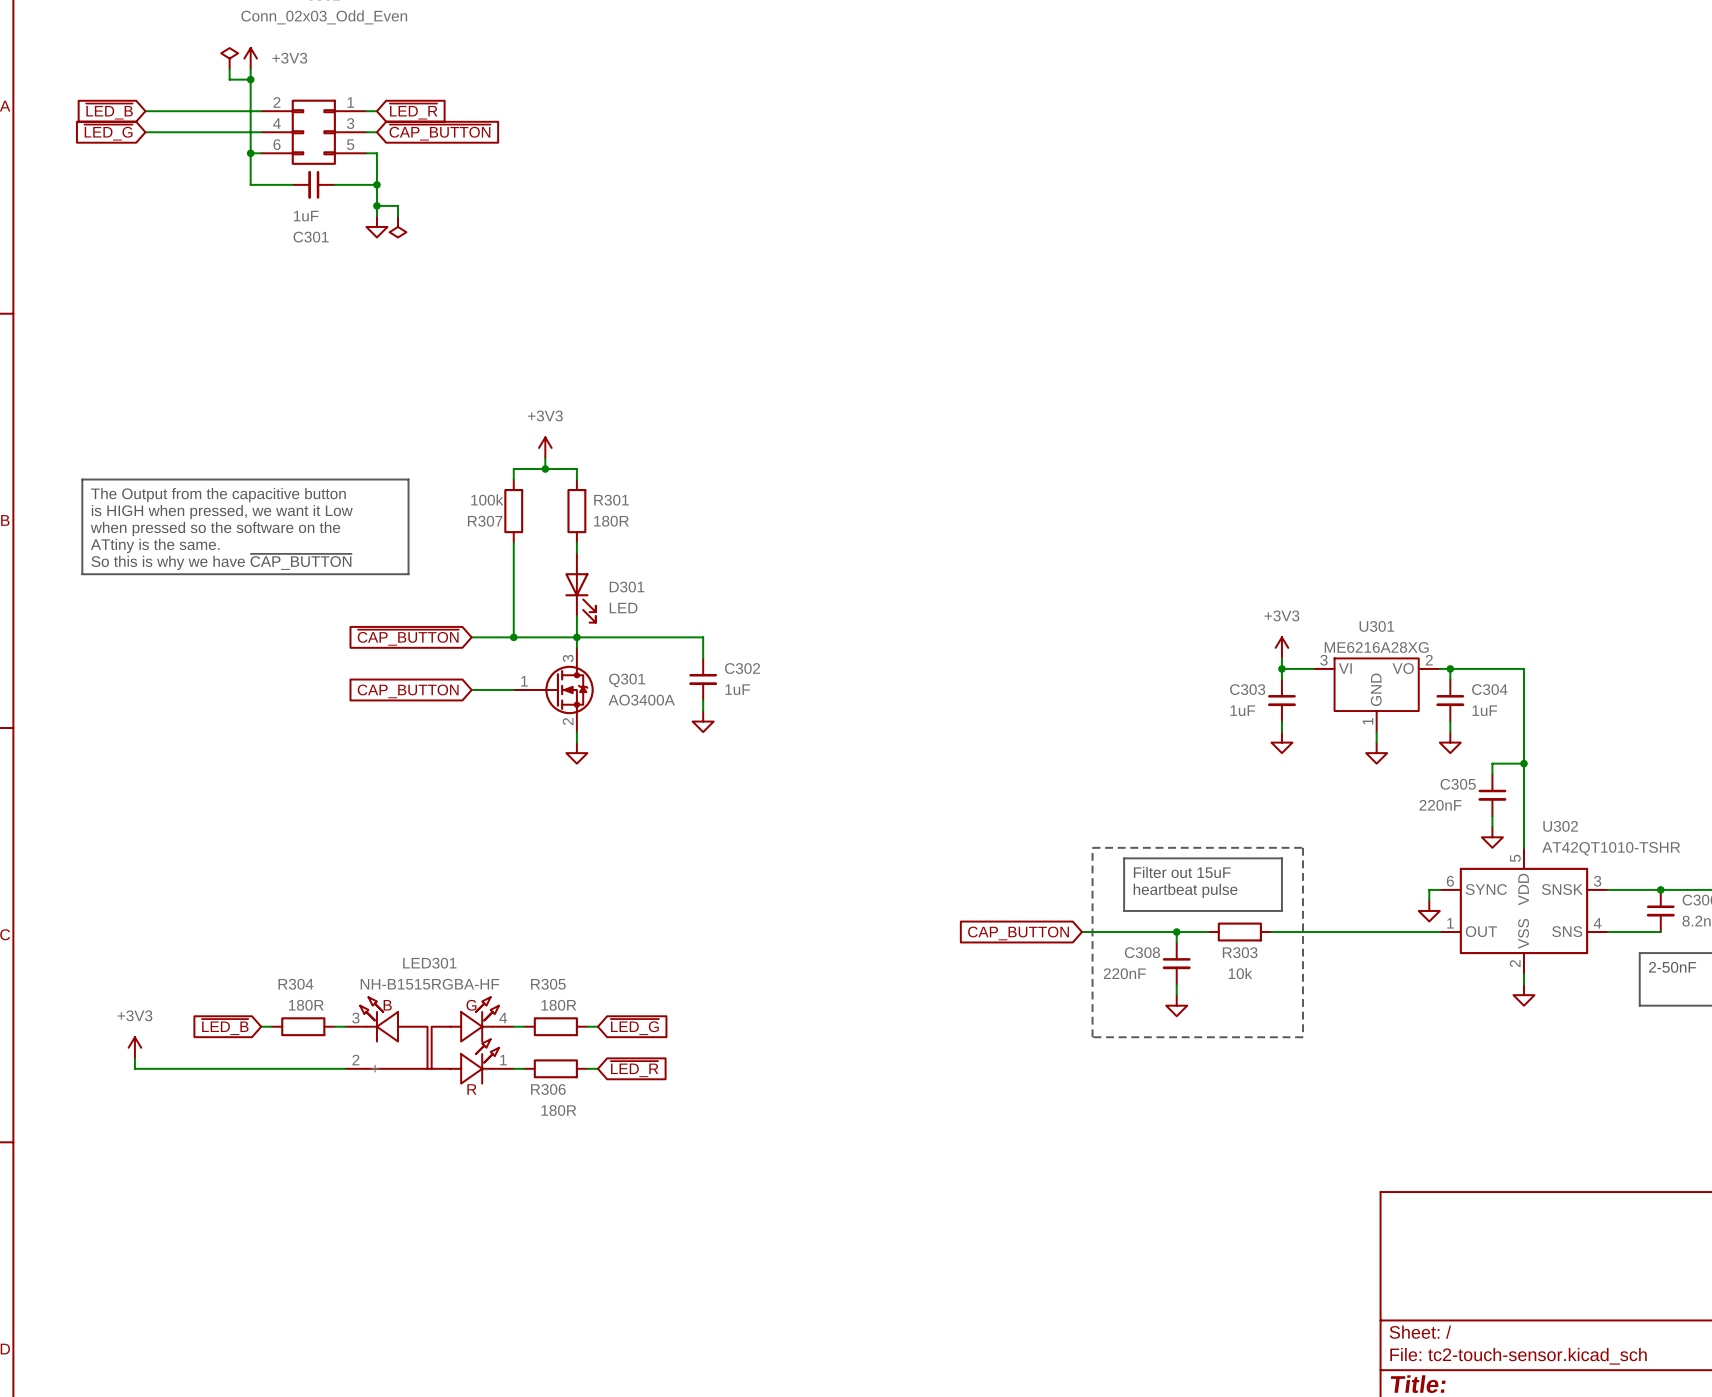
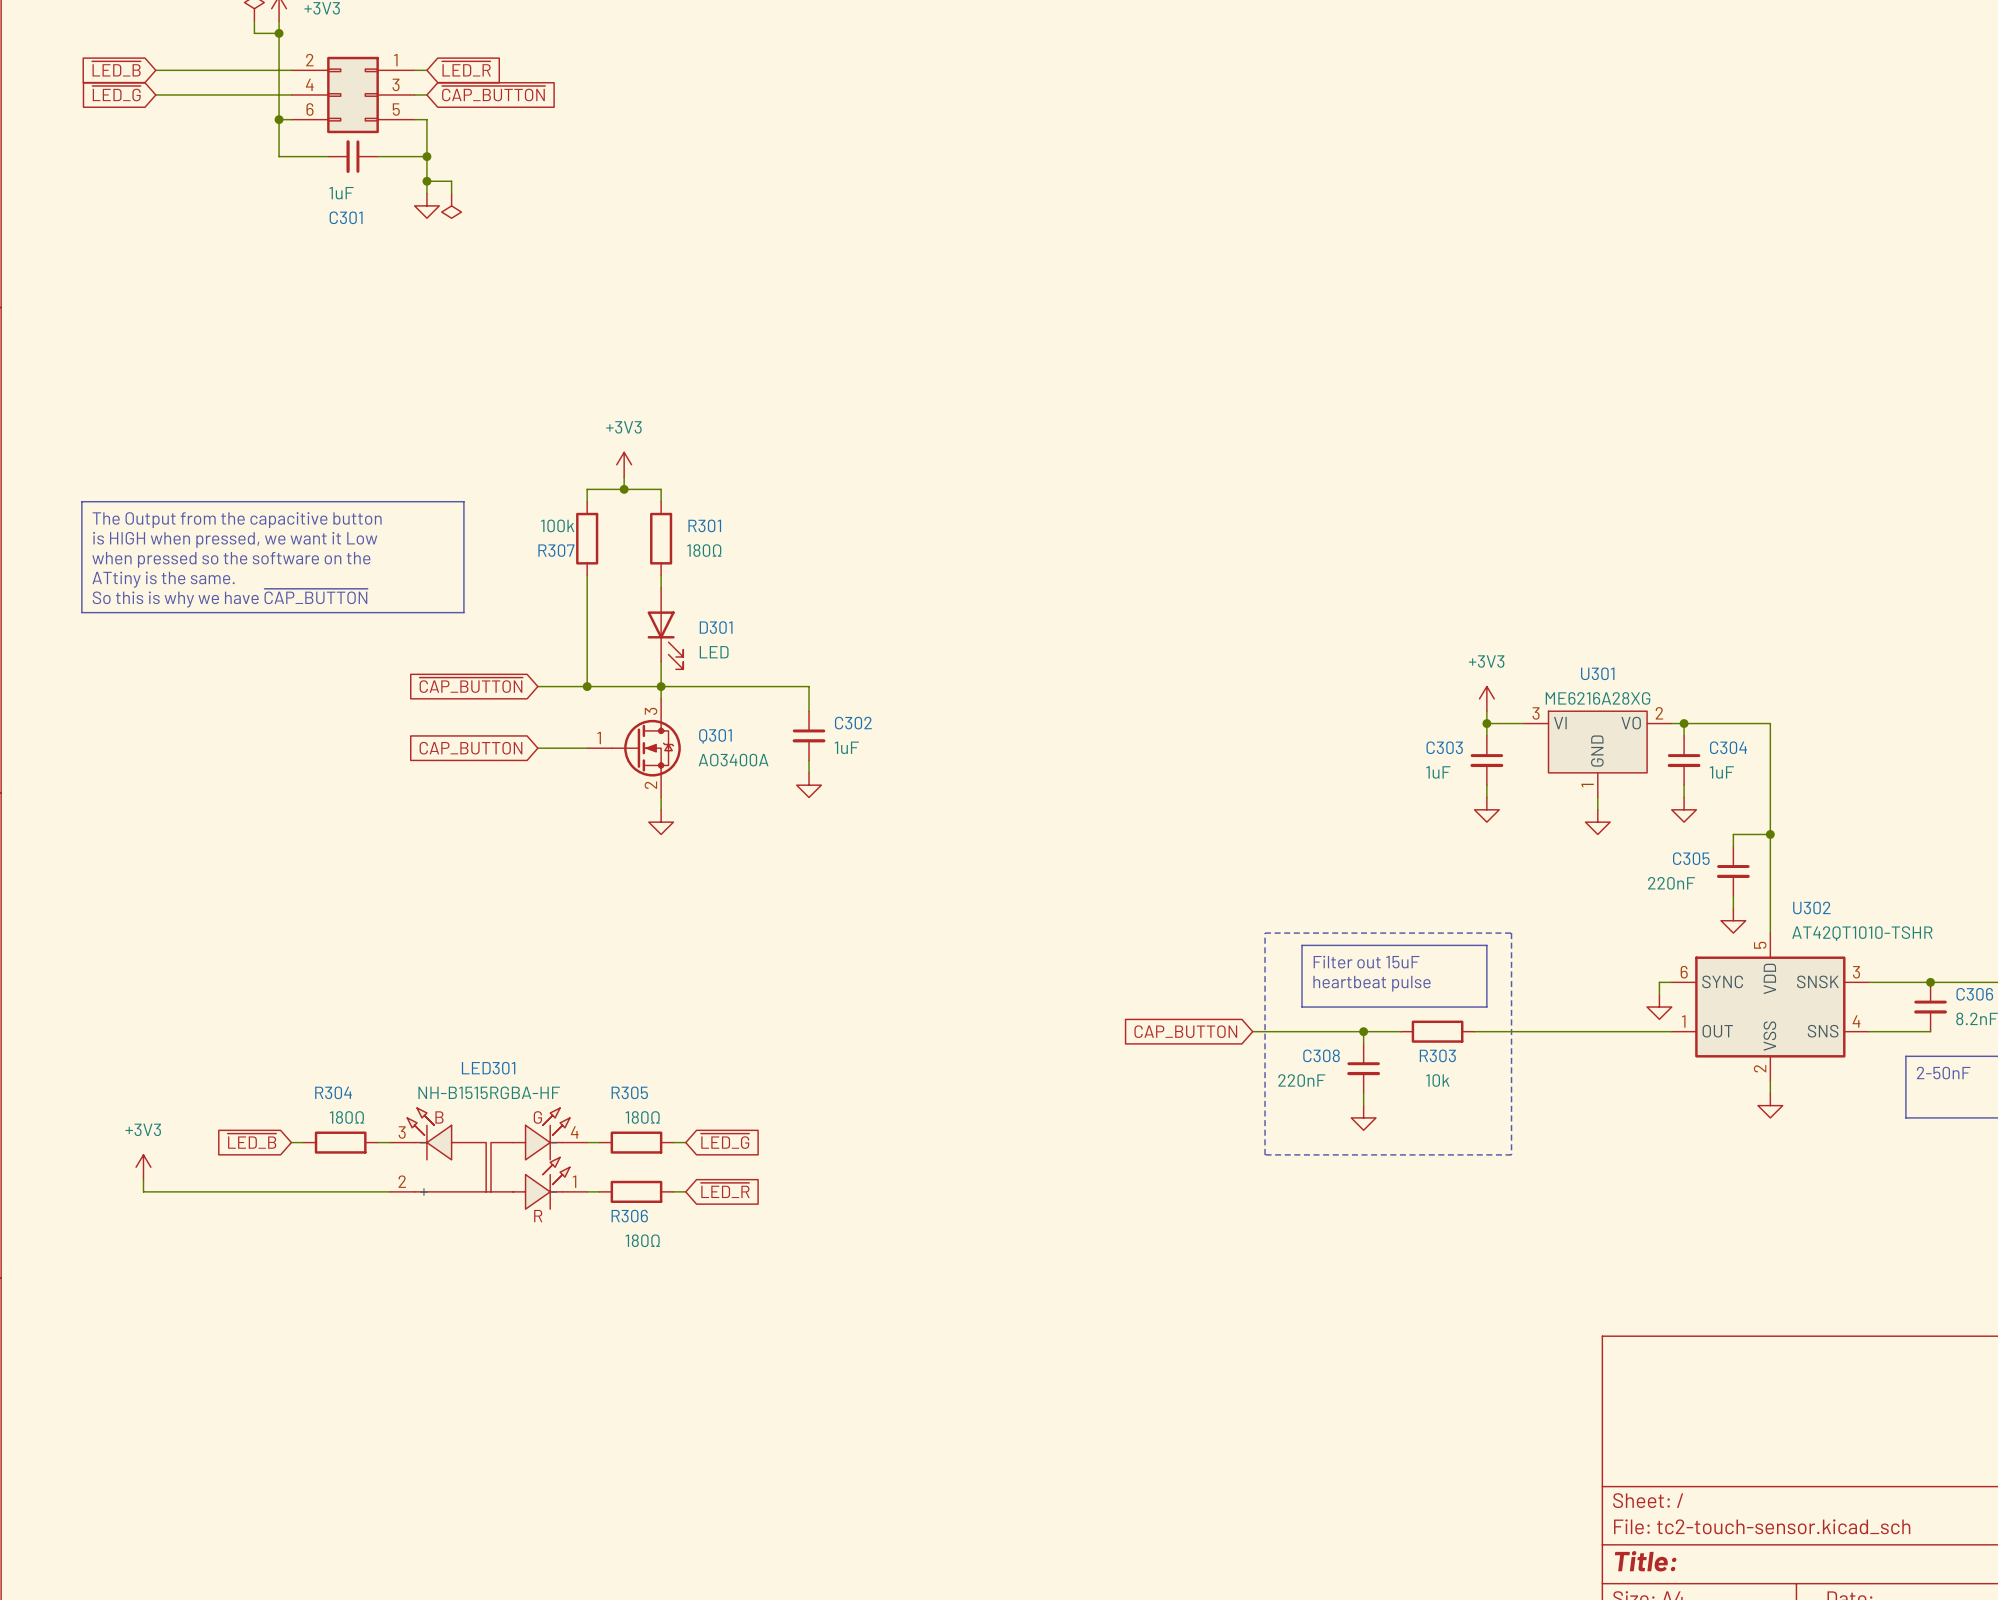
R301 value: 180R (611, 521) -> 180Ω (704, 550)
R304 value: 180R (306, 1005) -> 180Ω (346, 1117)
R305 value: 180R (558, 1005) -> 180Ω (642, 1117)
R306 value: 180R (558, 1110) -> 180Ω (642, 1240)

